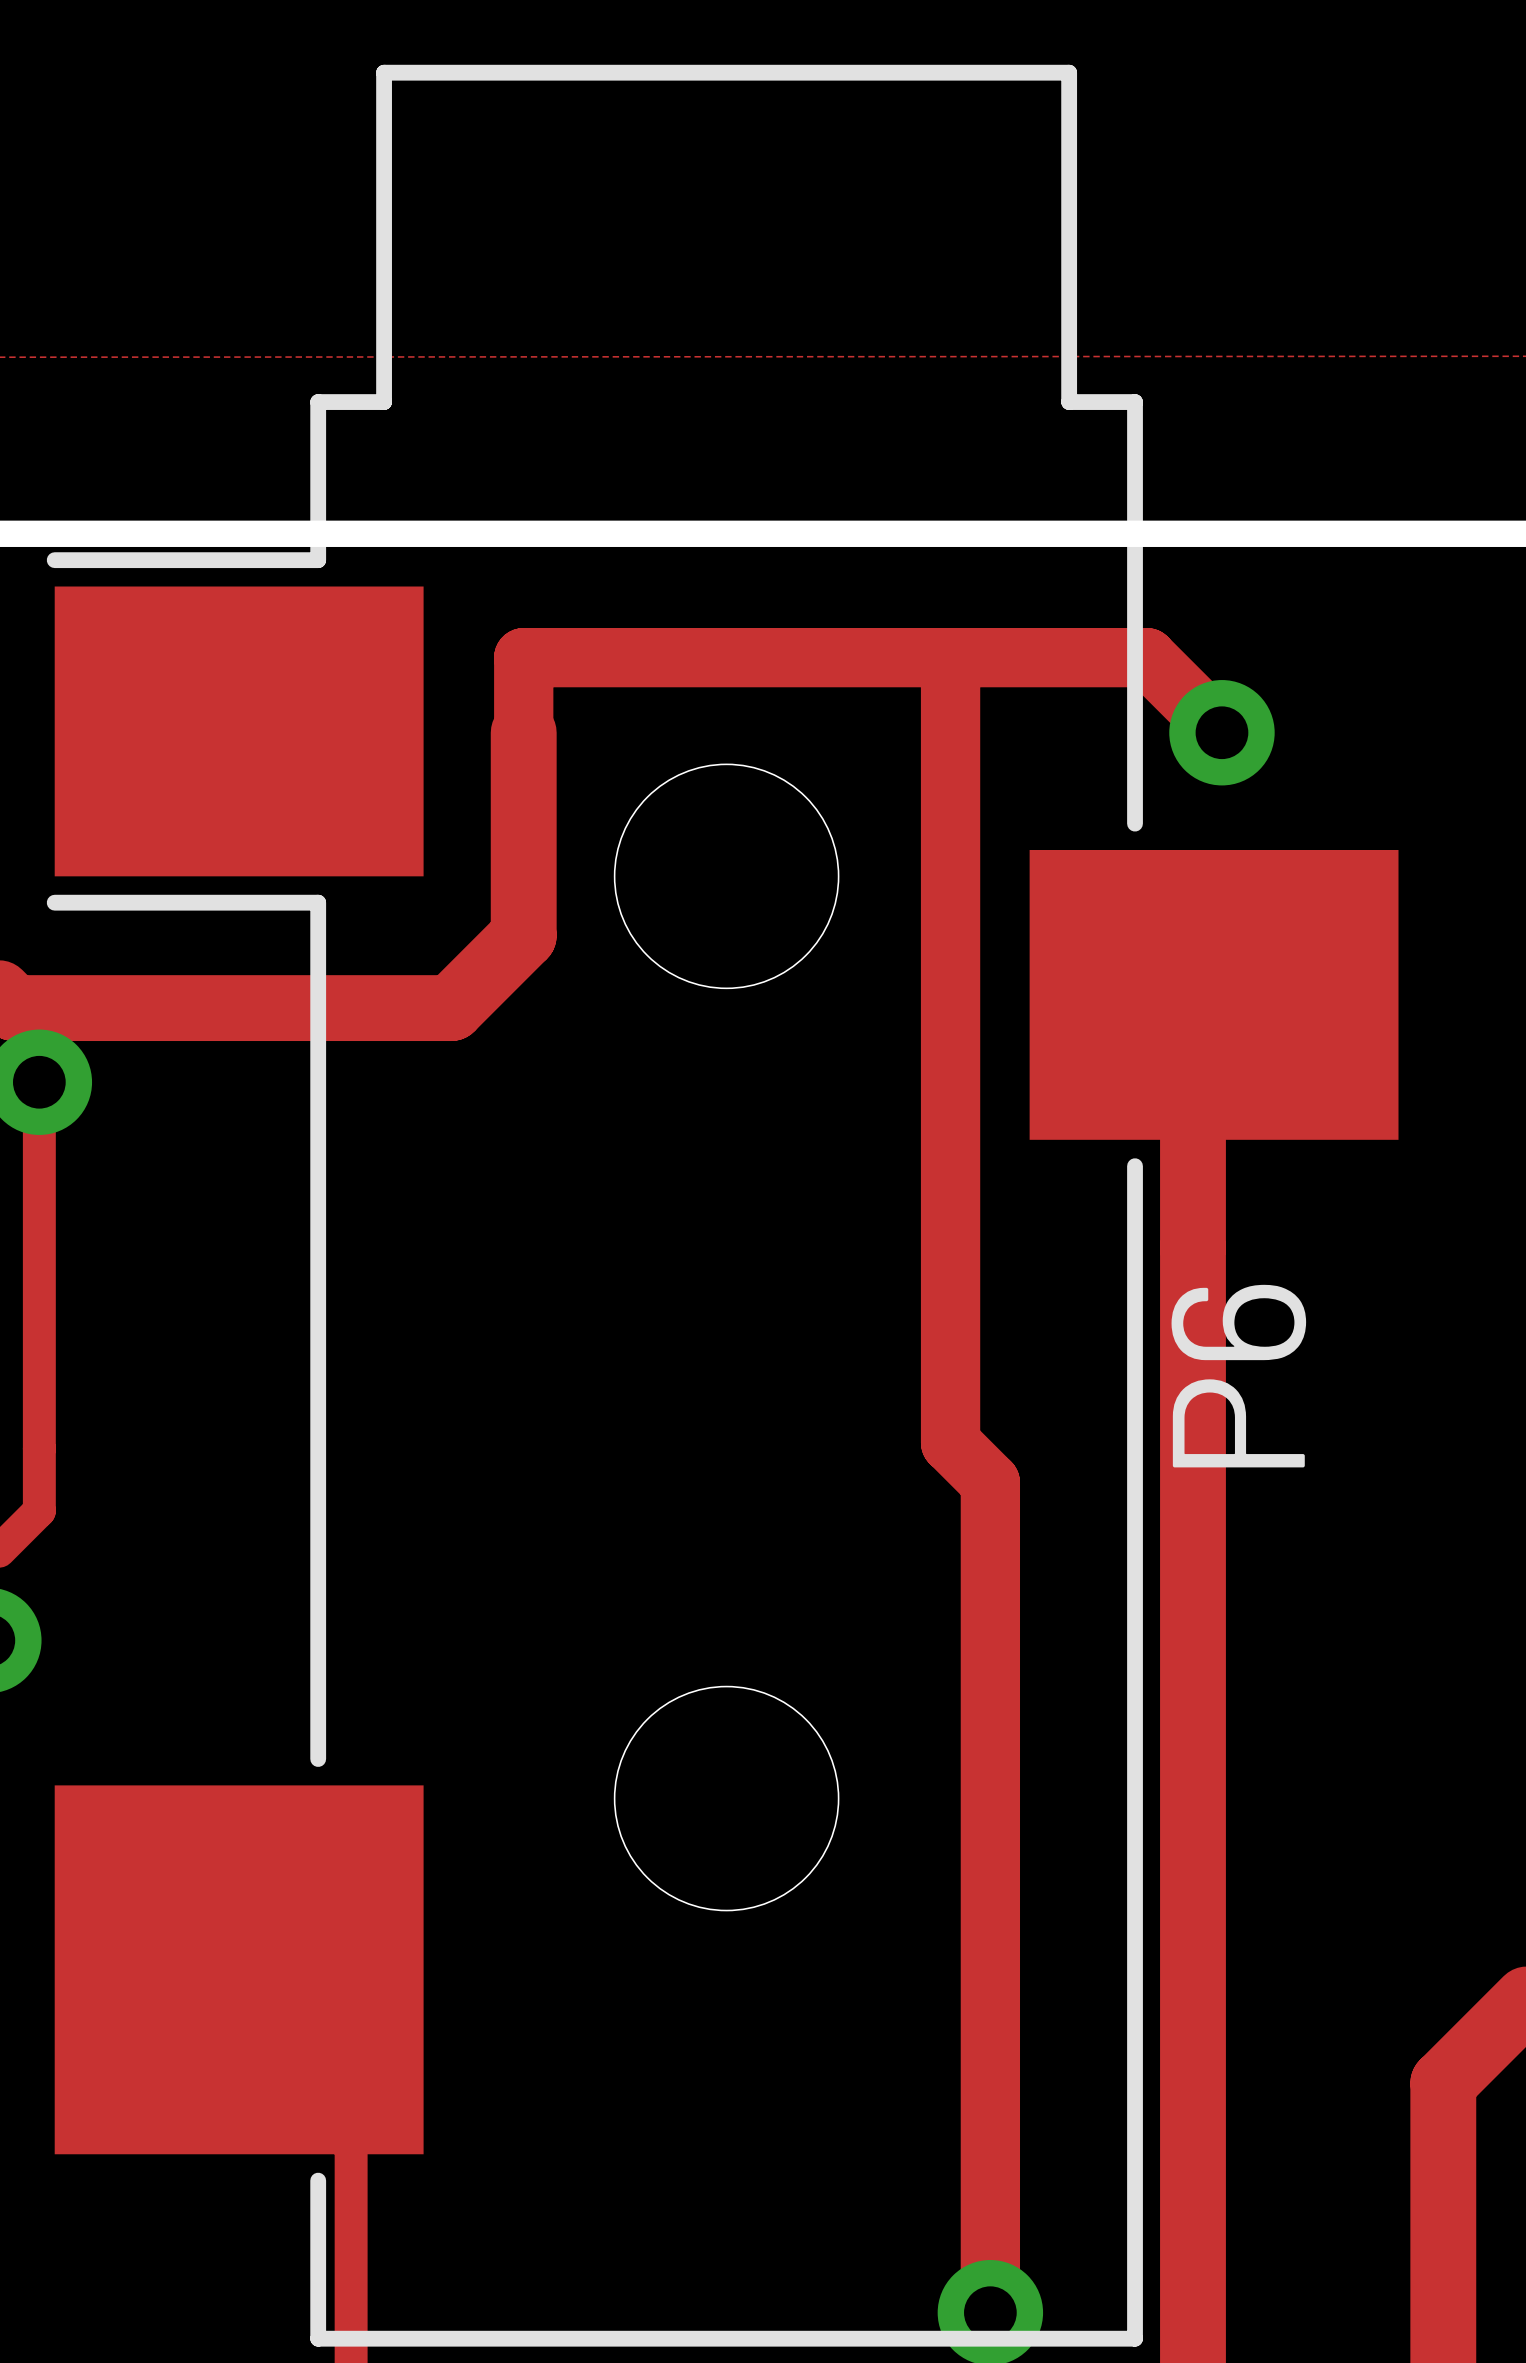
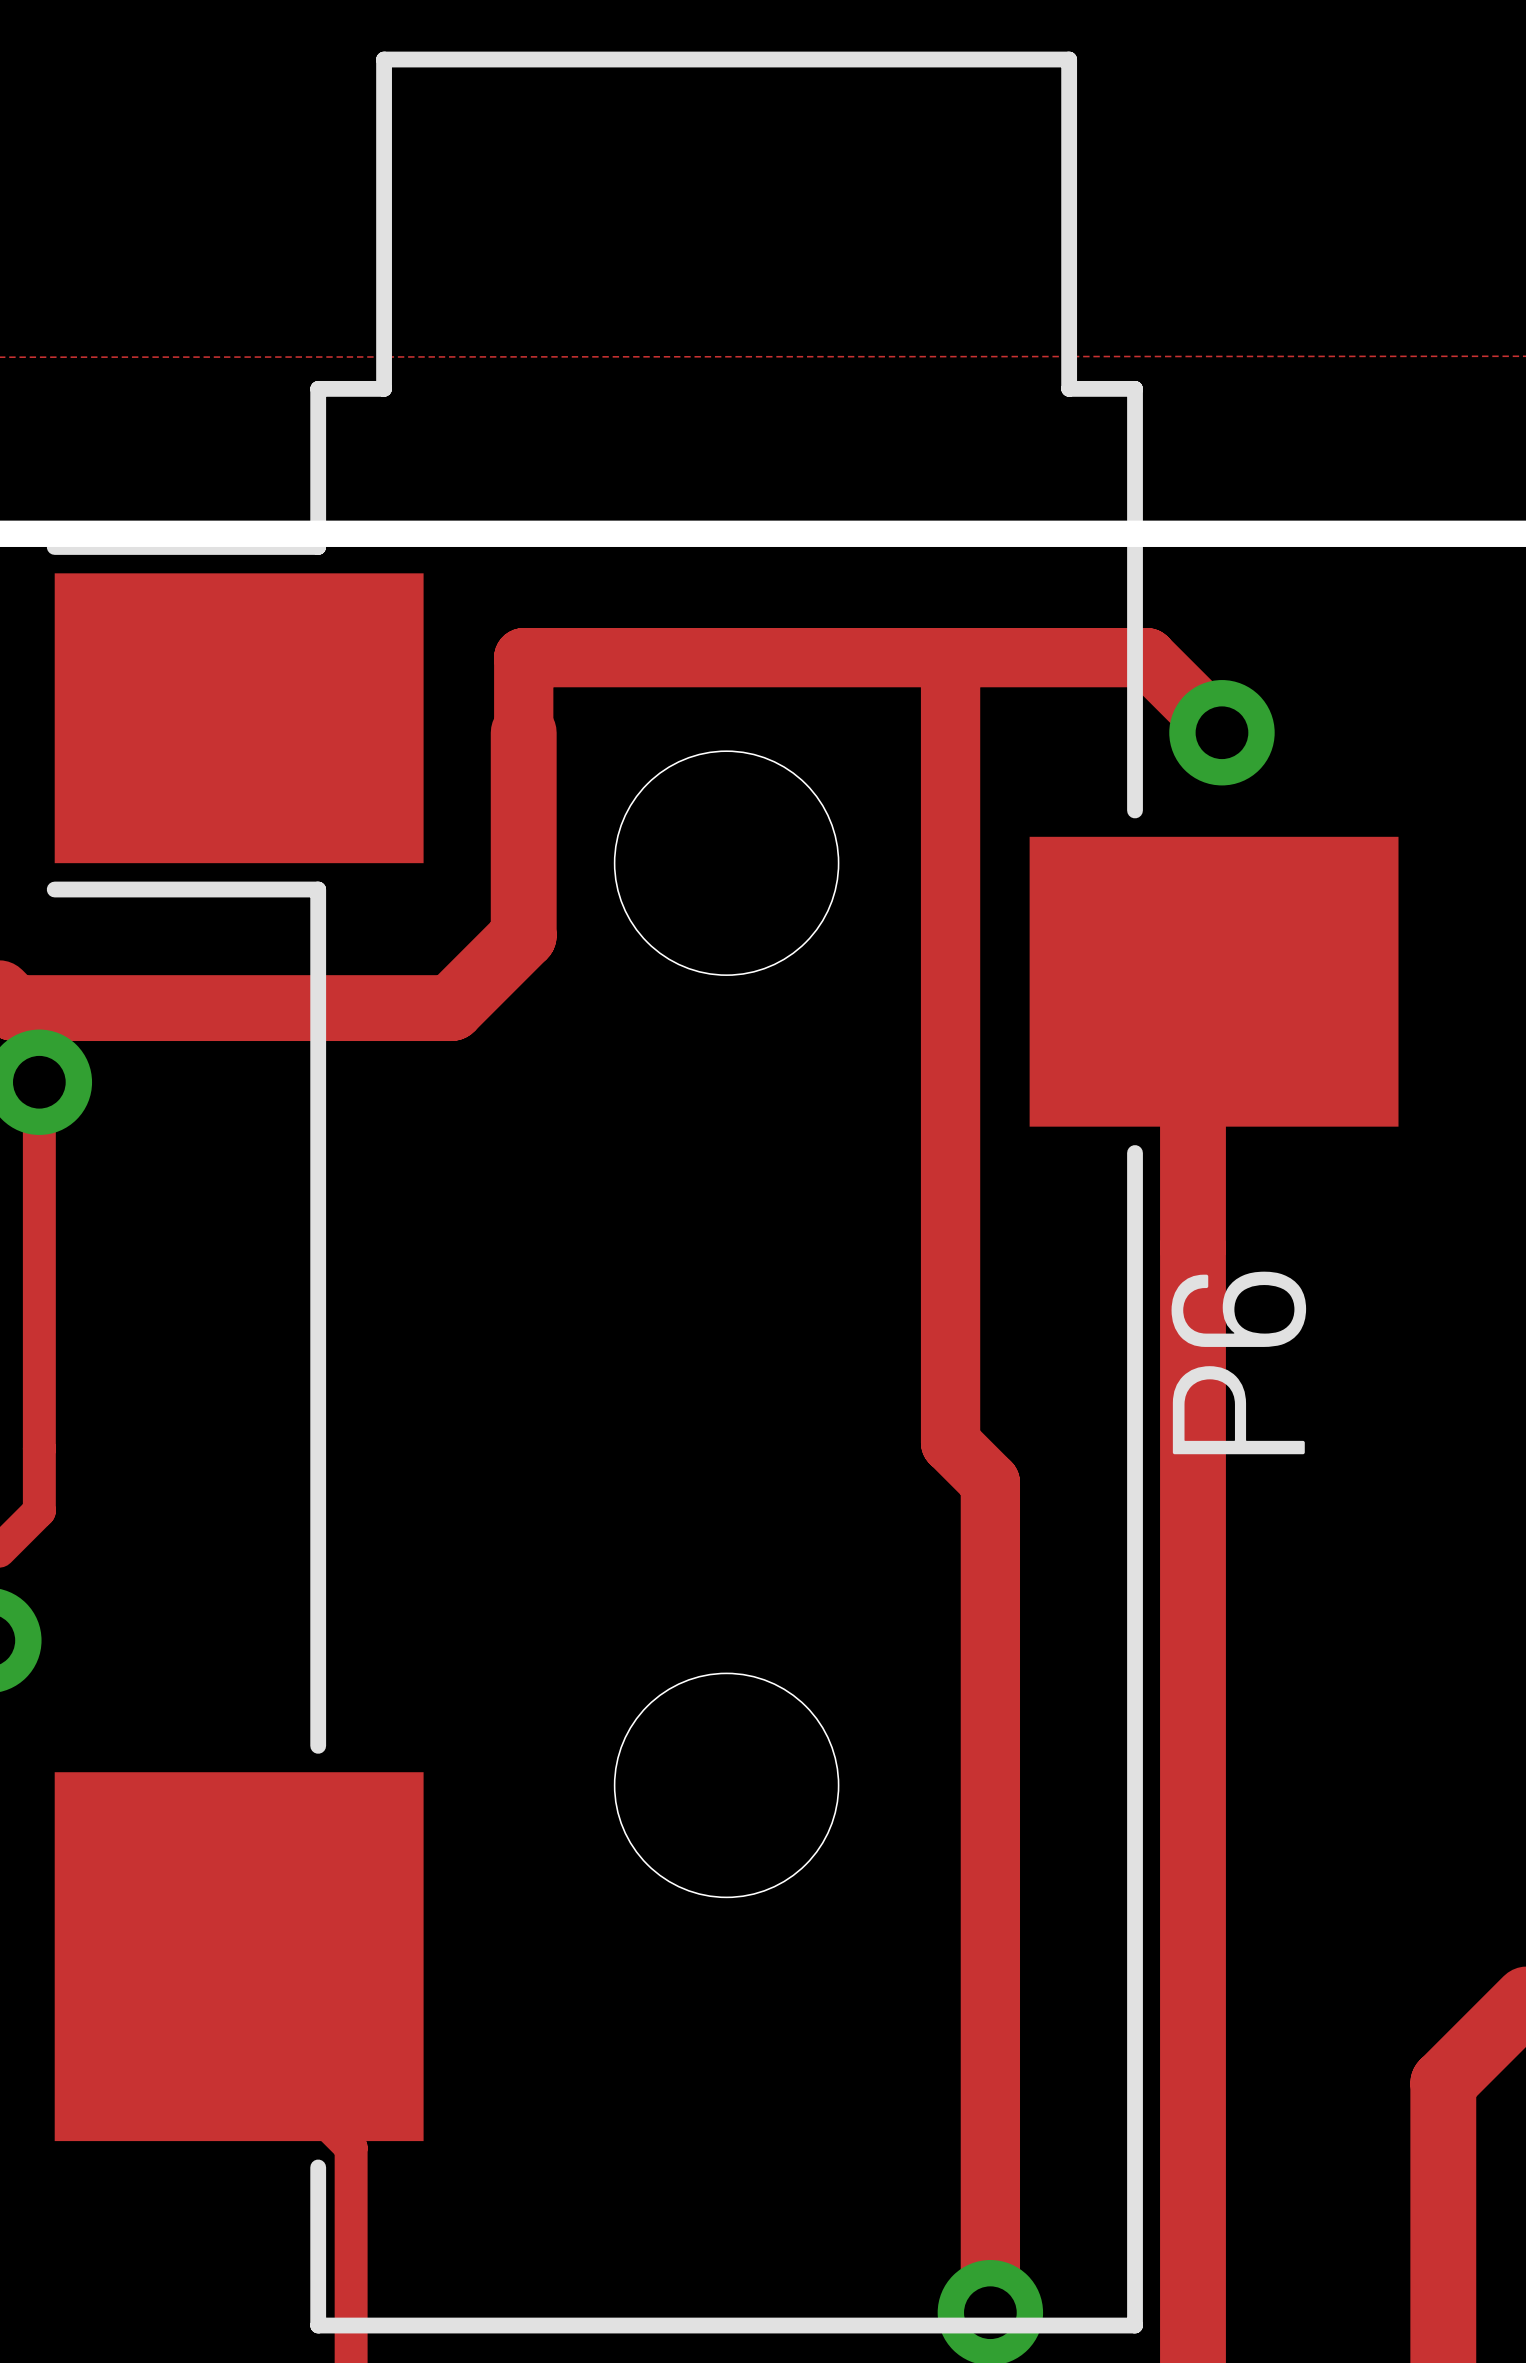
P6 position: (722, 1205) -> (722, 1192)

